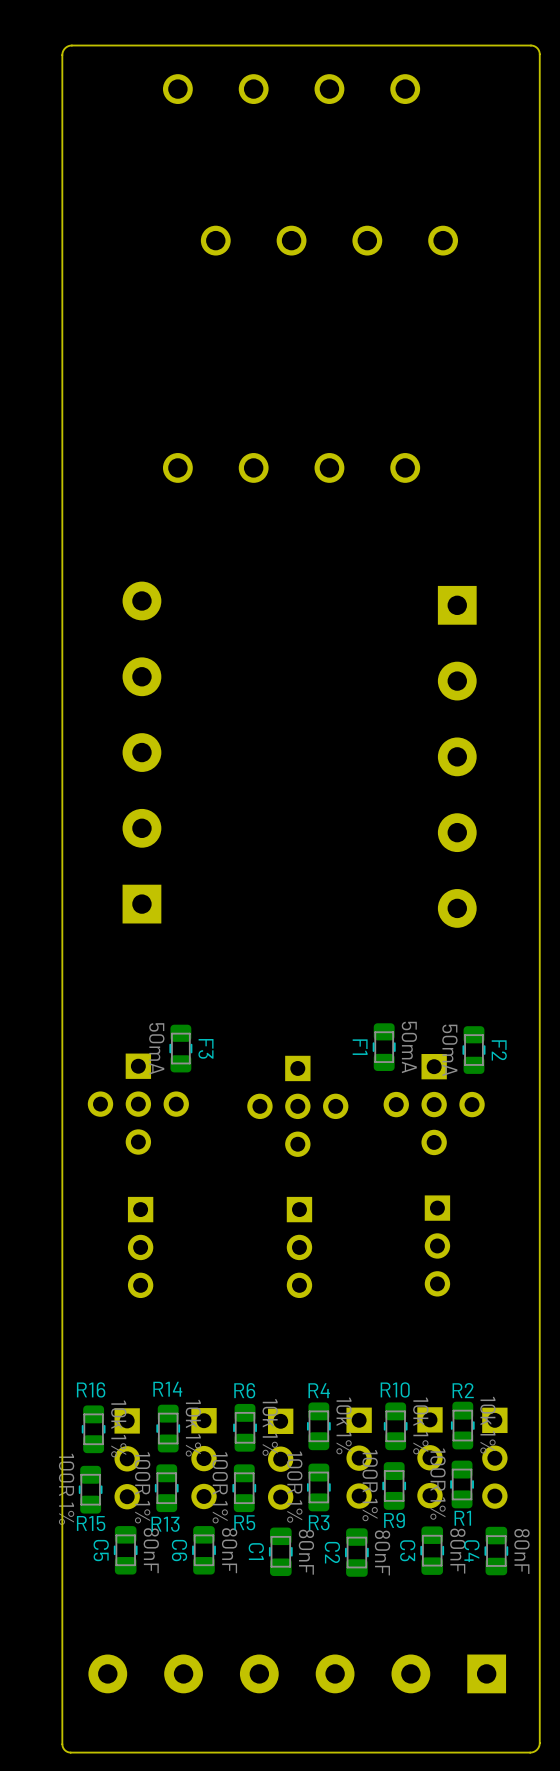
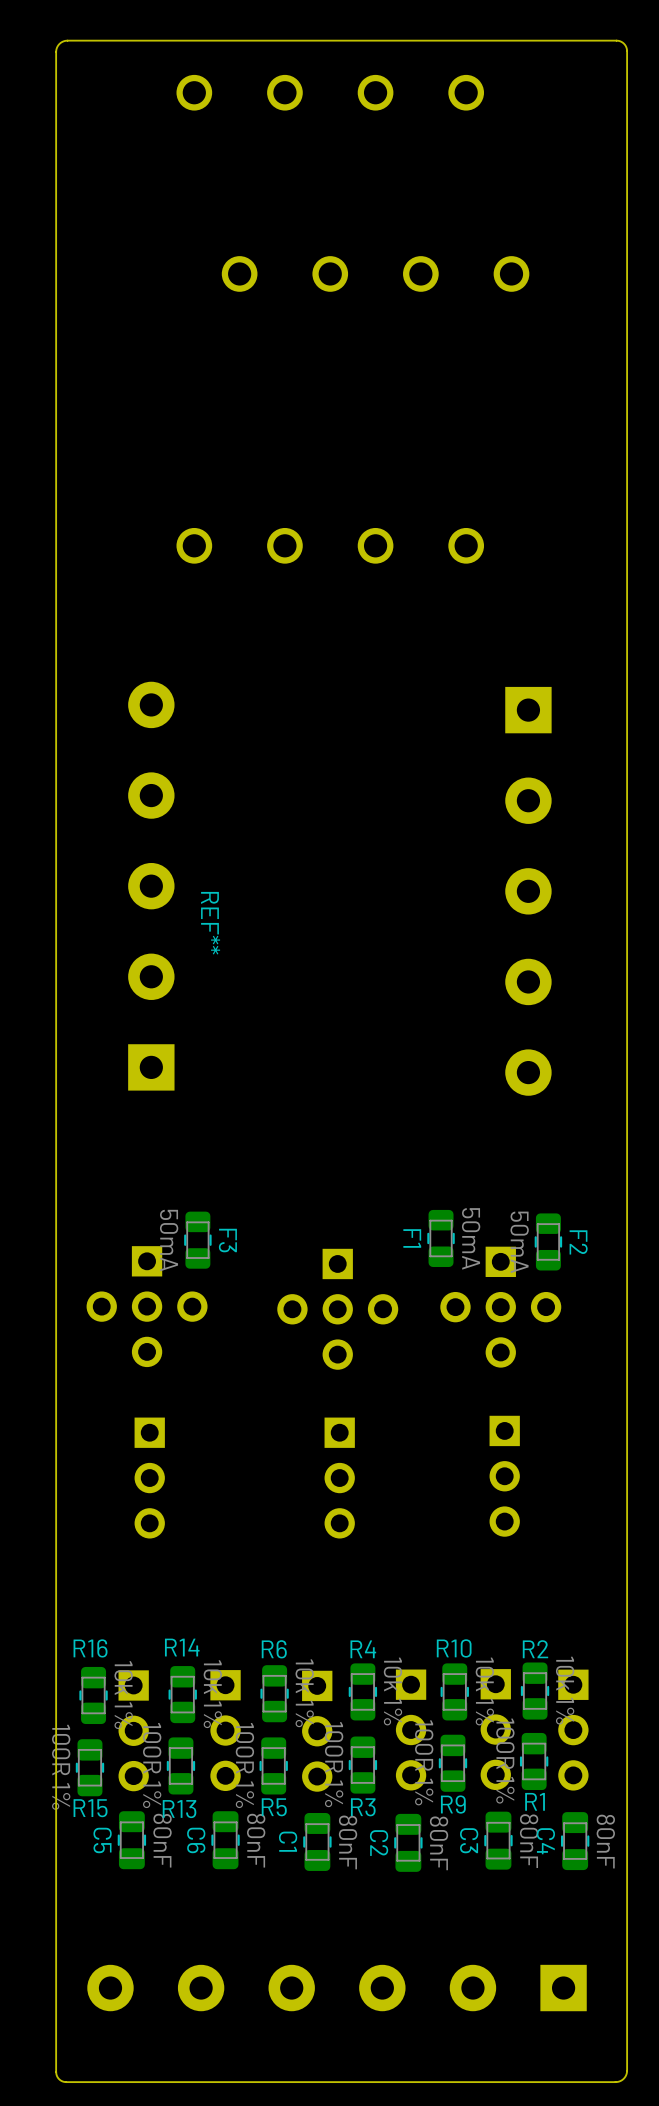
REF**: none -> (210, 923)

